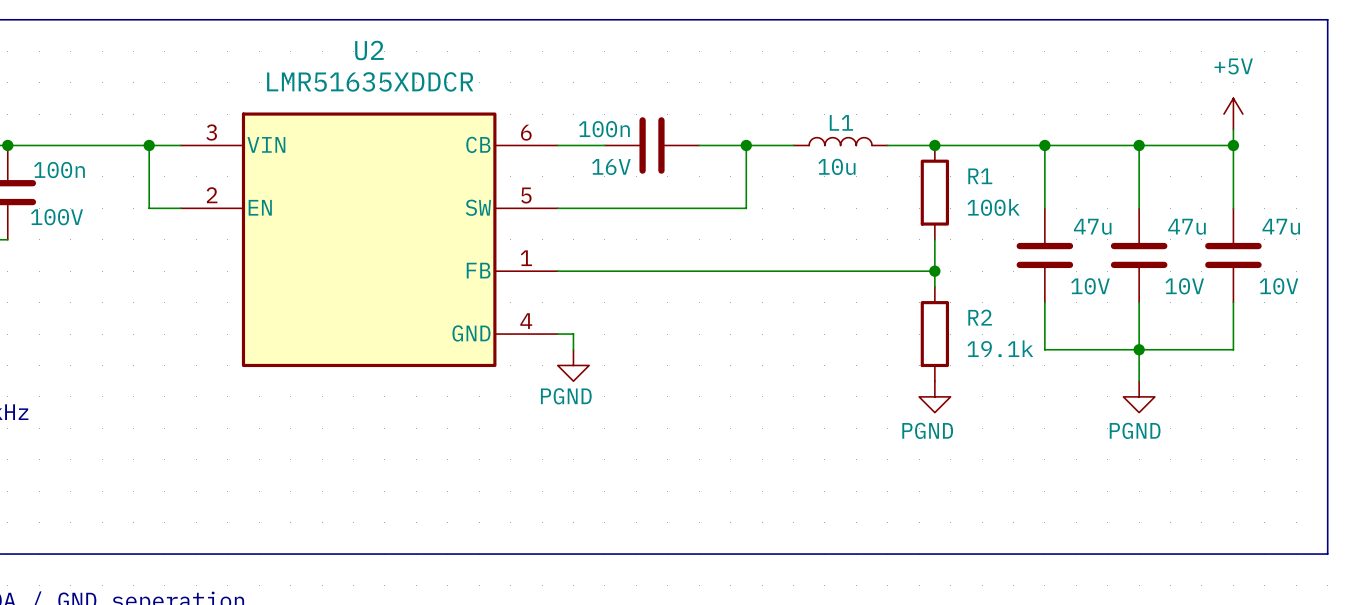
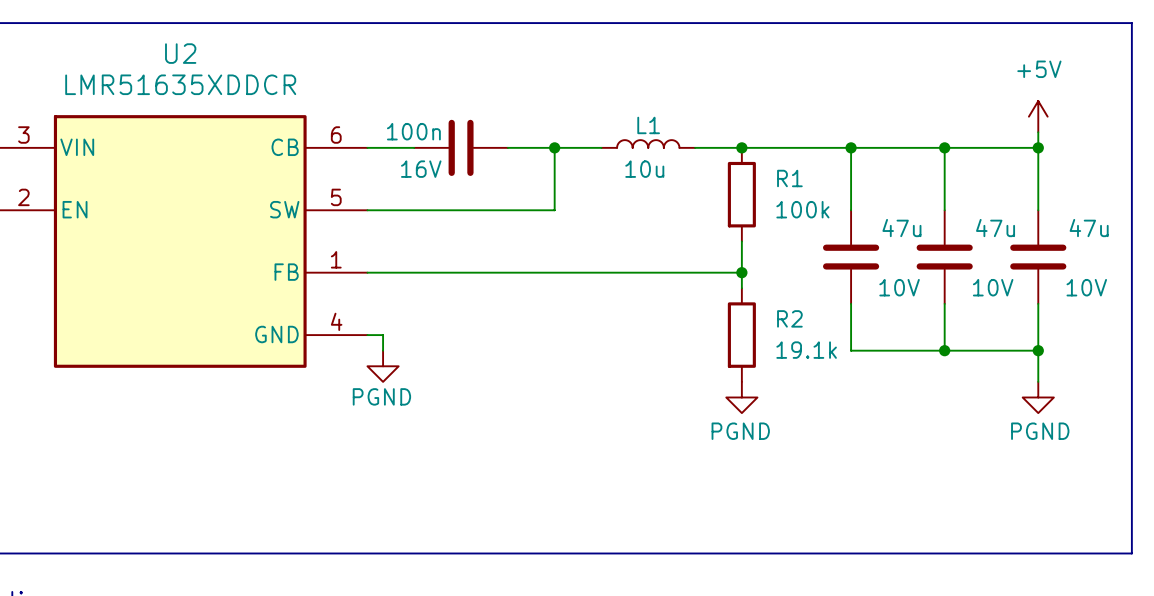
wire: (1139, 349) (1139, 381) -> (1038, 350) (1038, 381)
junction: none -> (1038, 350)
power symbol position: PGND (1139, 396) -> PGND (1038, 397)

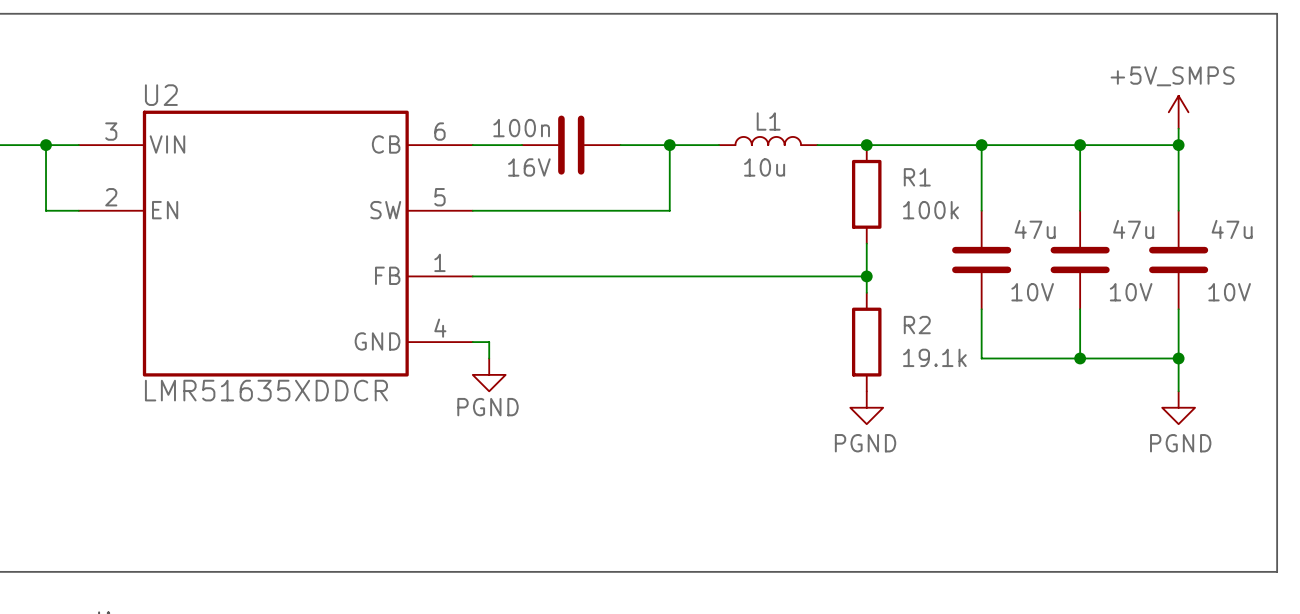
U2 name position: U2 (180, 53) -> U2 (161, 95)
U2 value position: LMR51635XDDCR (180, 84) -> LMR51635XDDCR (266, 390)
power symbol: +5V (1038, 116) -> +5V_SMPS (1178, 112)

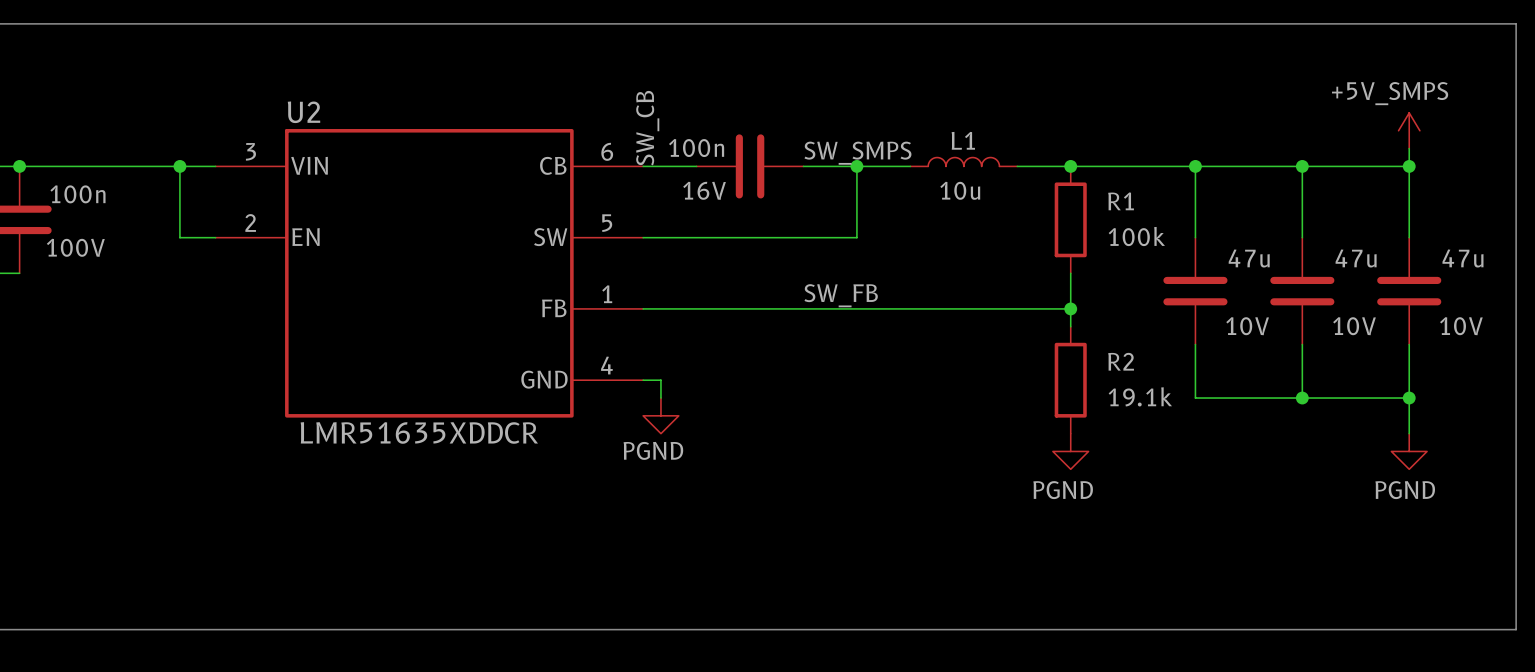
label: none -> SW_CB (647, 128)
label: none -> SW_SMPS (857, 153)
label: none -> SW_FB (841, 295)

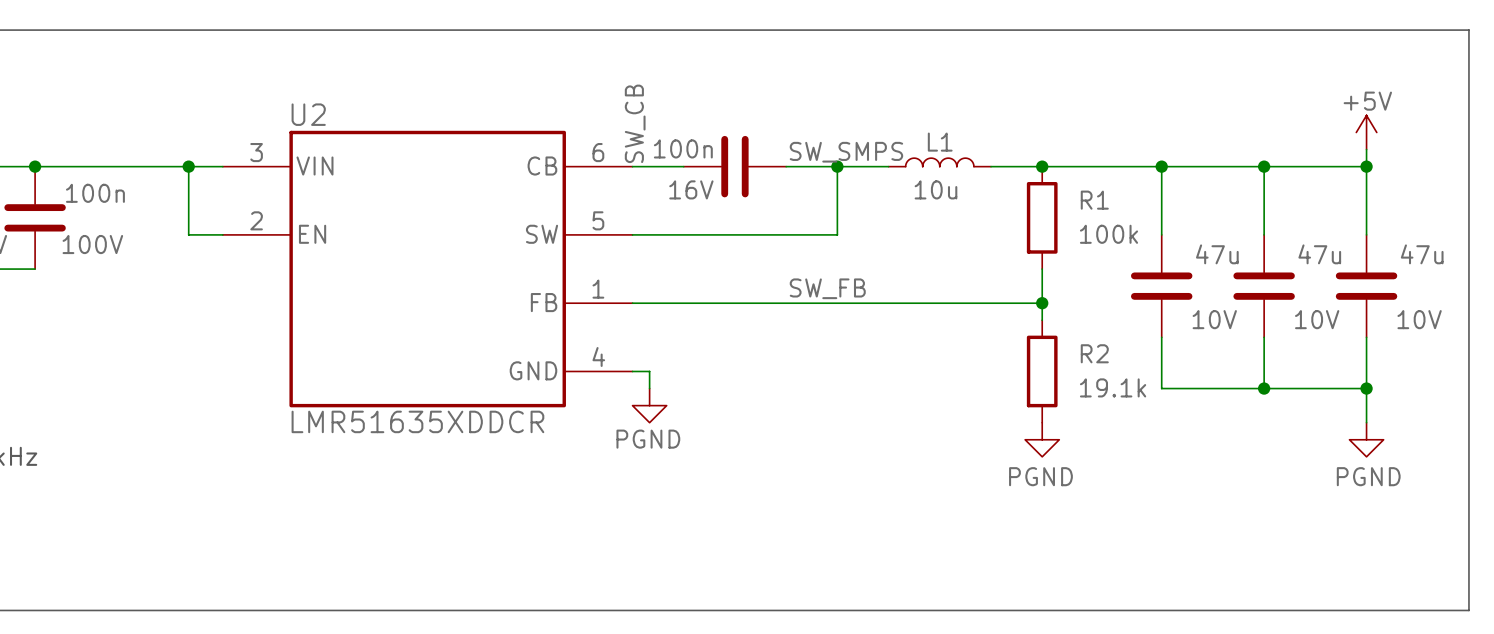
power symbol: +5V_SMPS (1409, 130) -> +5V (1366, 132)

